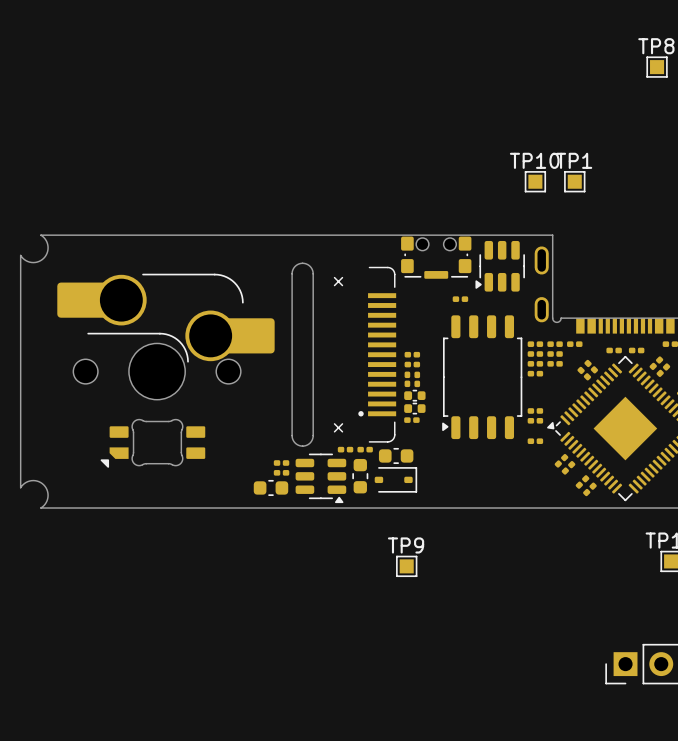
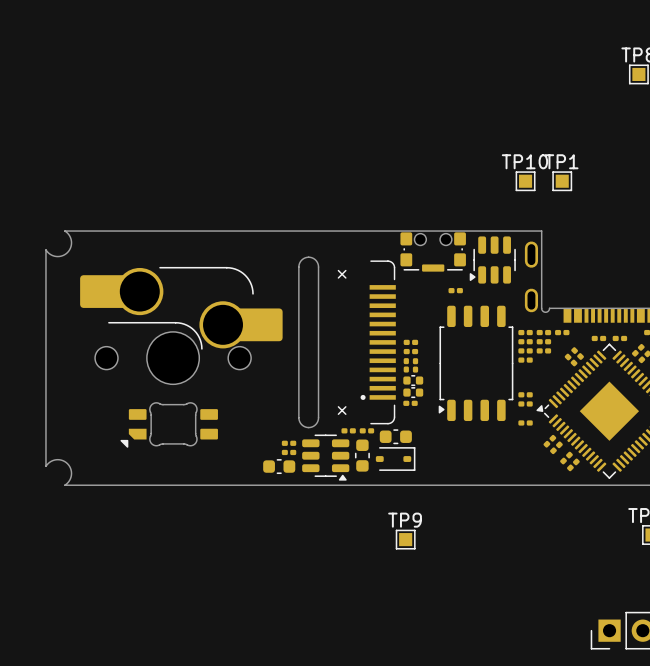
part: none -> (566, 458)
part: (582, 481) -> none
part: none -> (573, 464)
part: (589, 489) -> none

